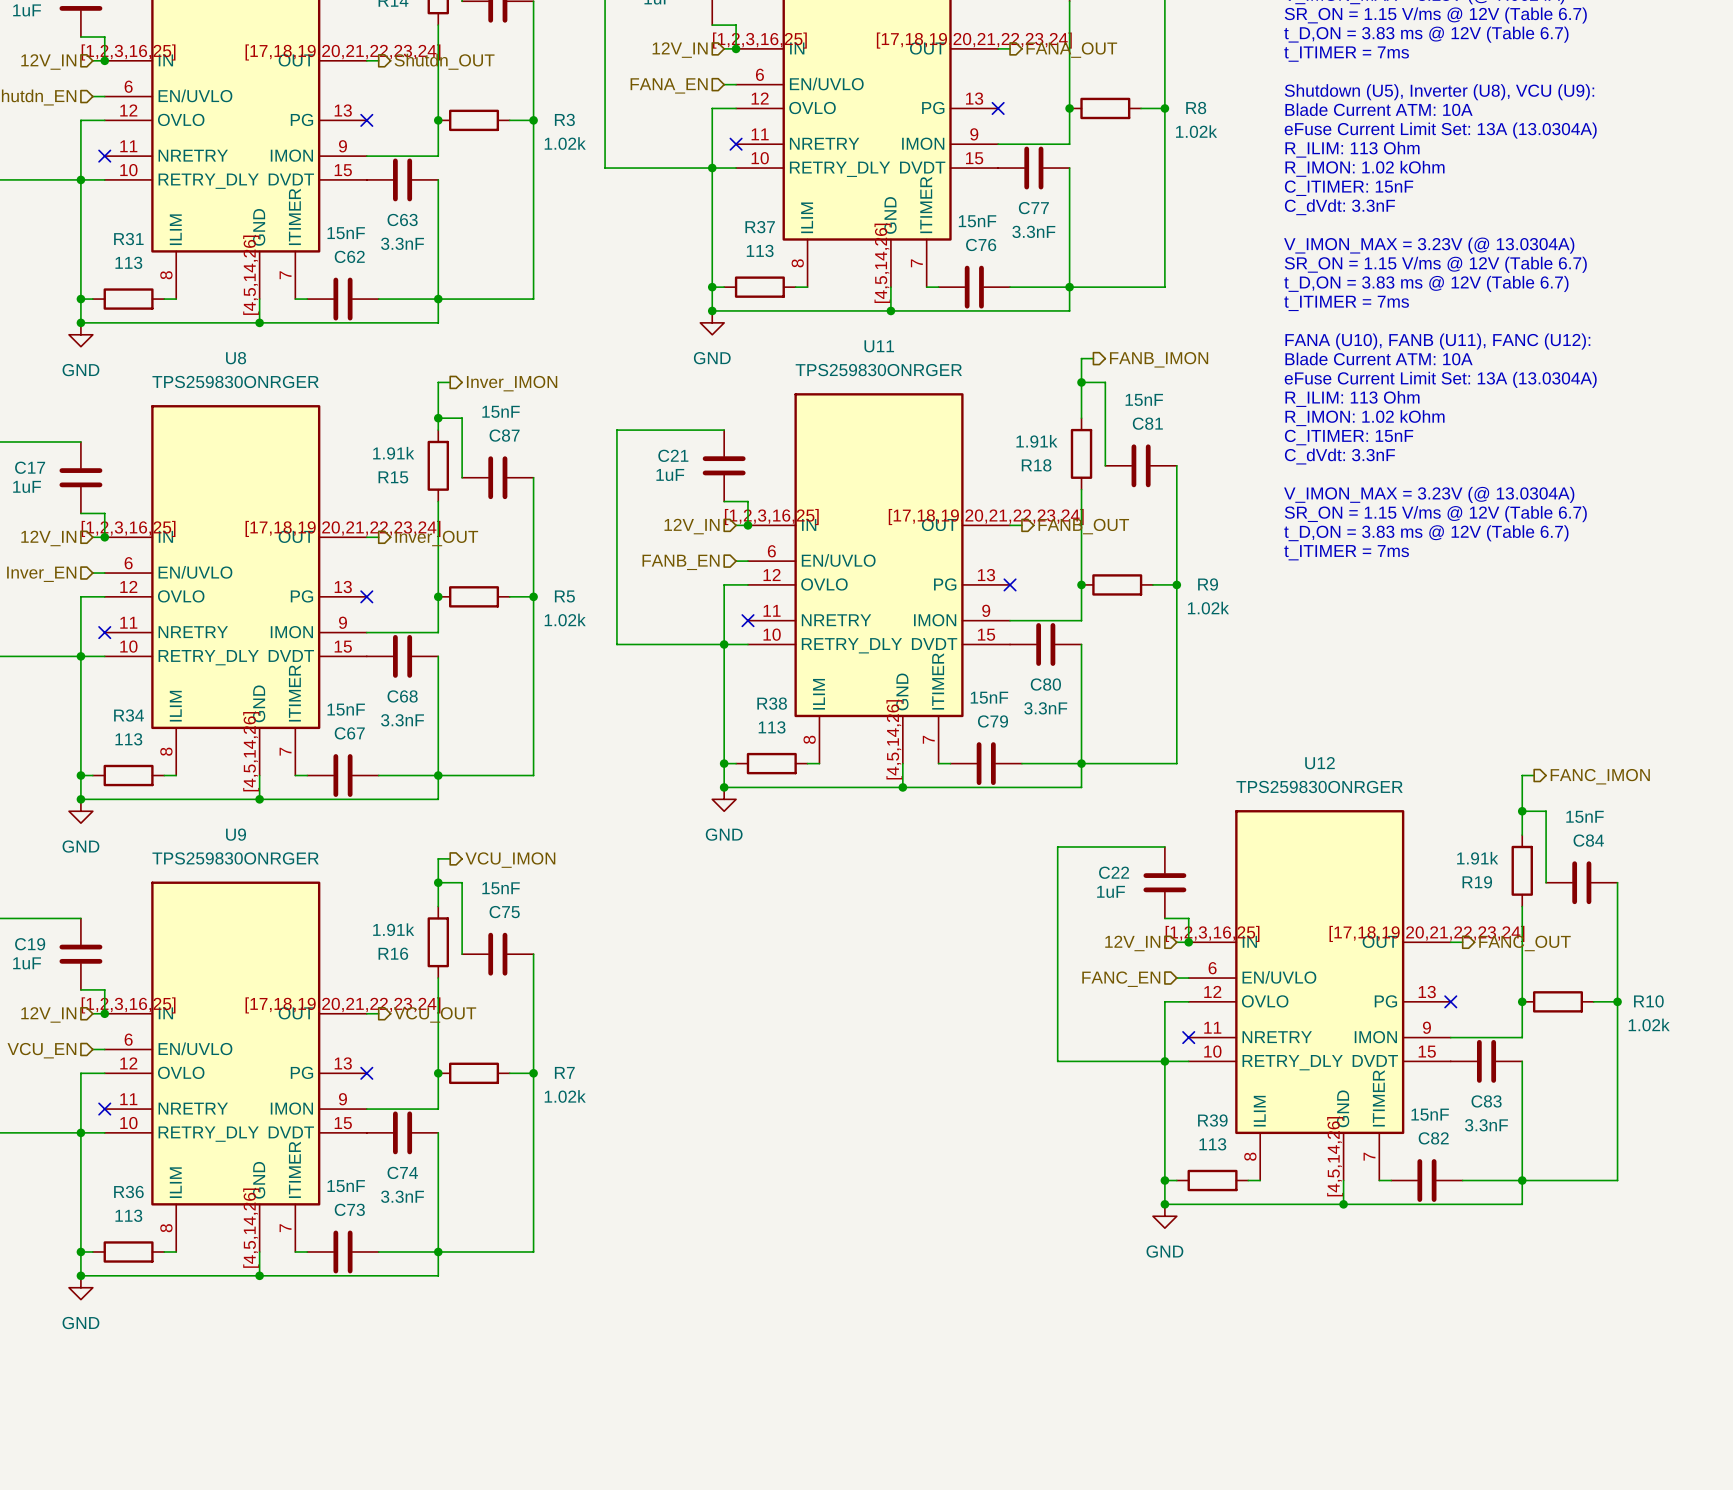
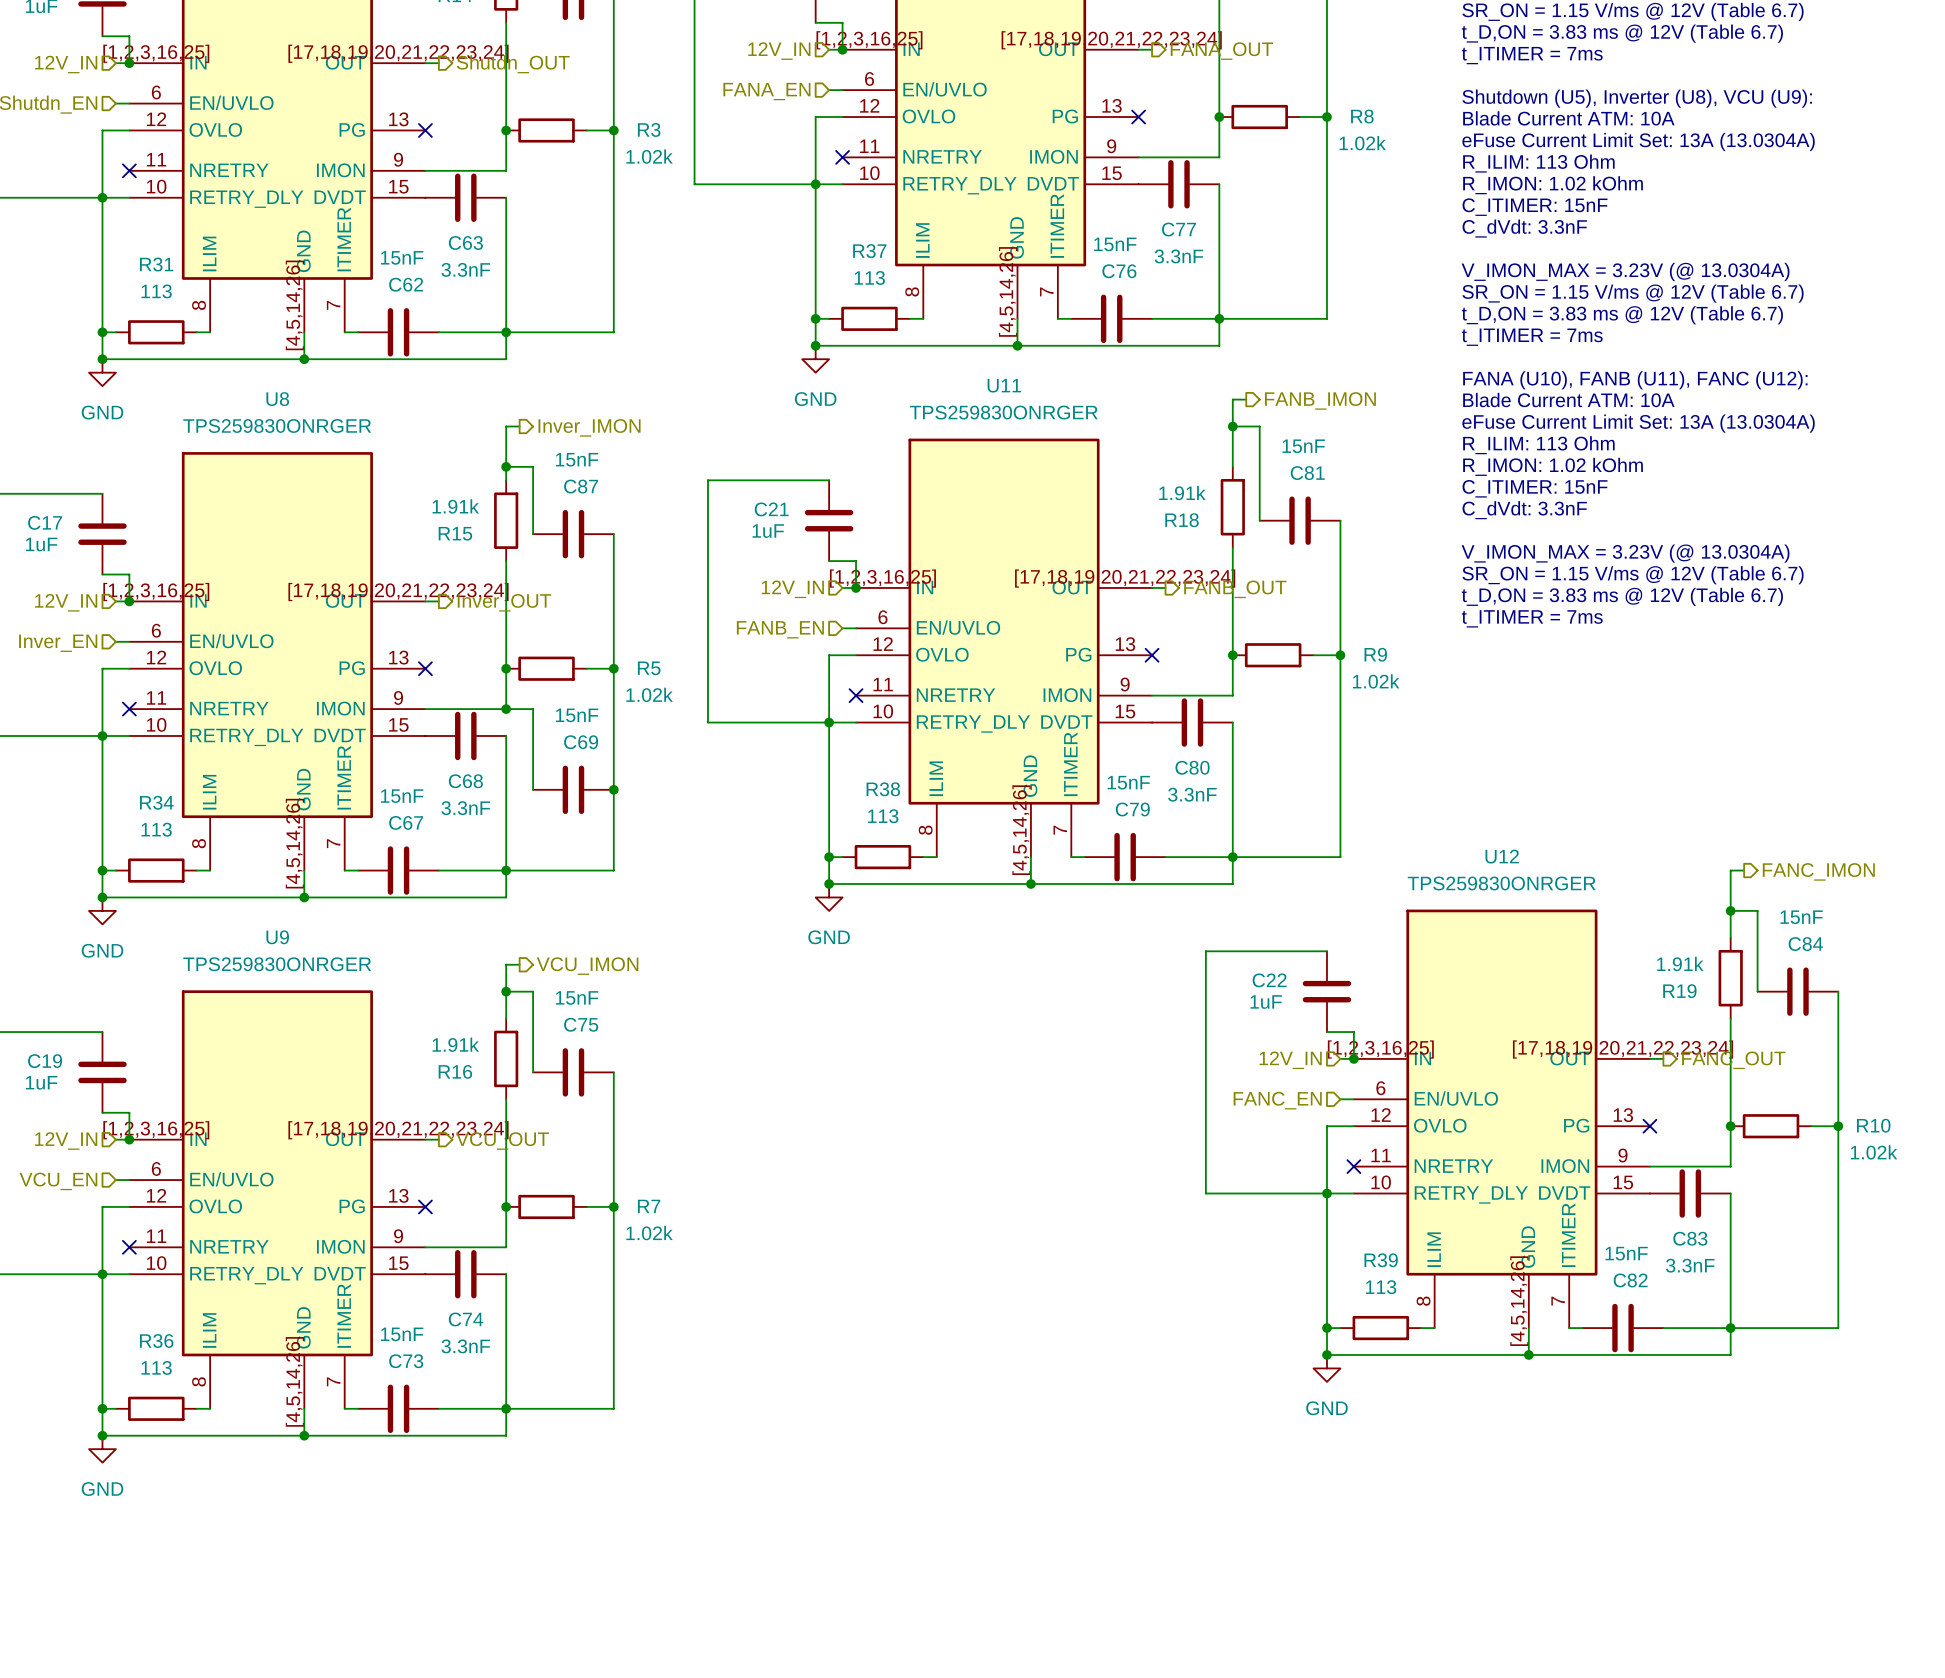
wire: none -> (506, 709) (533, 709) (533, 789)
junction: none -> (506, 709)
C69: none -> 15nF (573, 789)
junction: none -> (613, 789)

